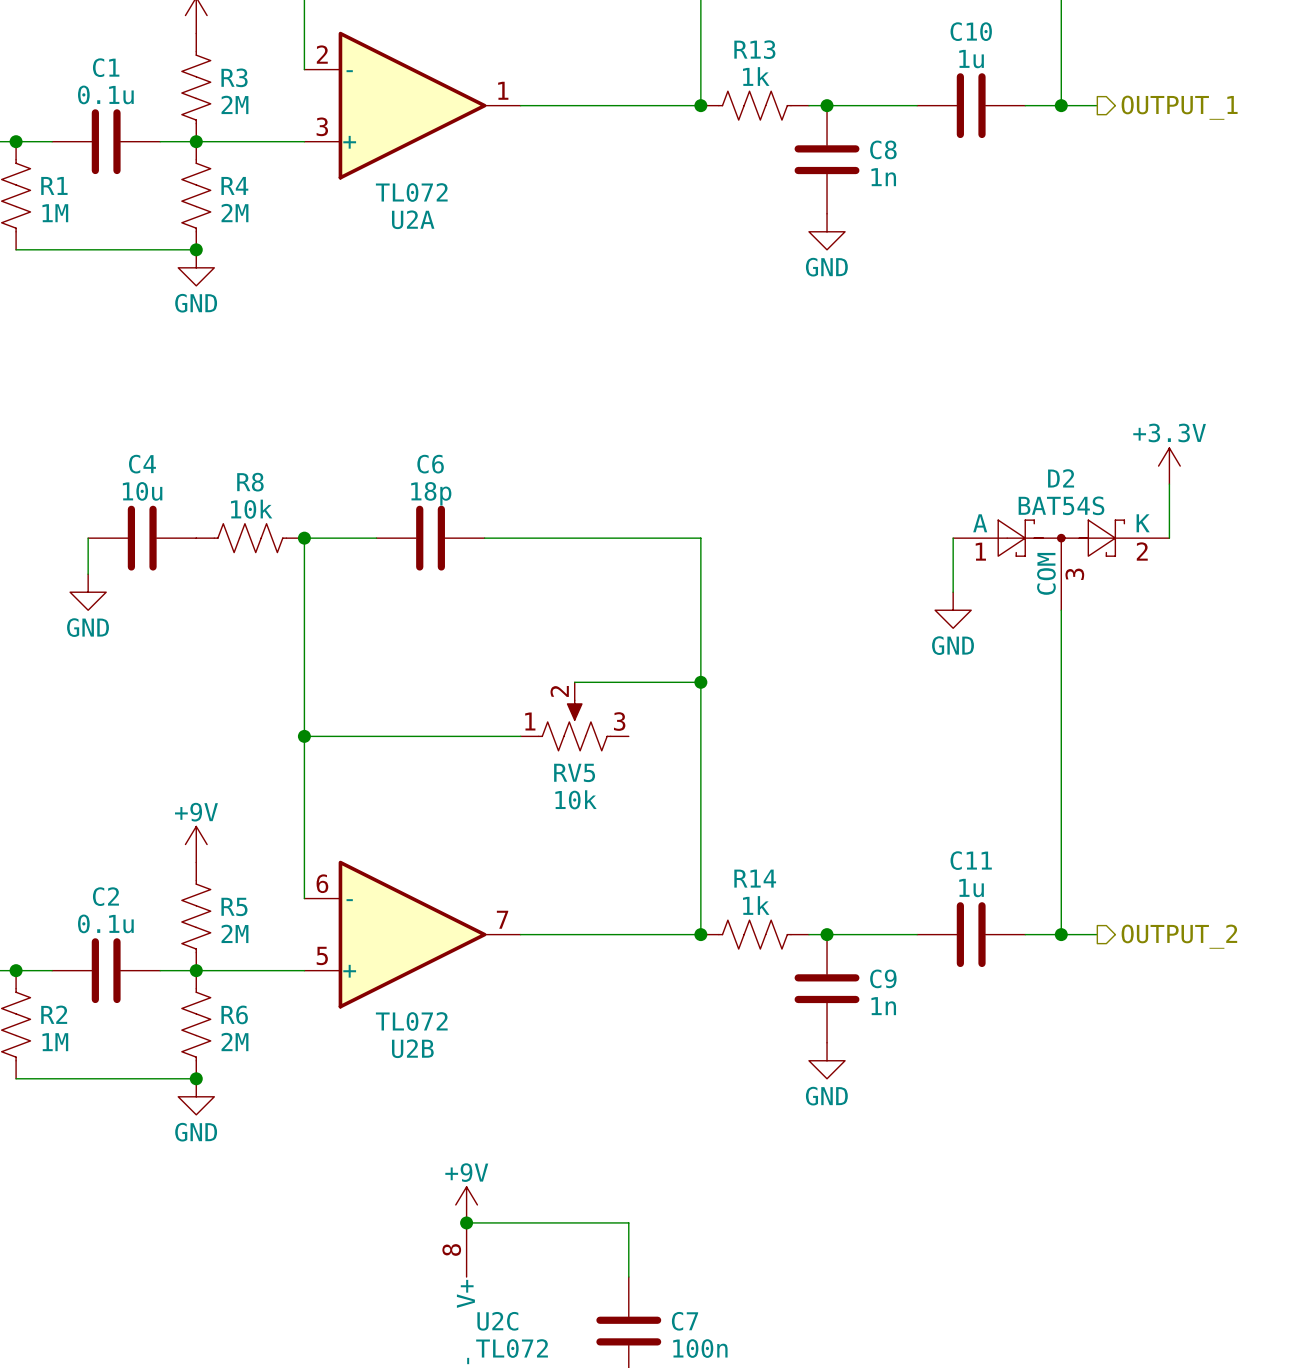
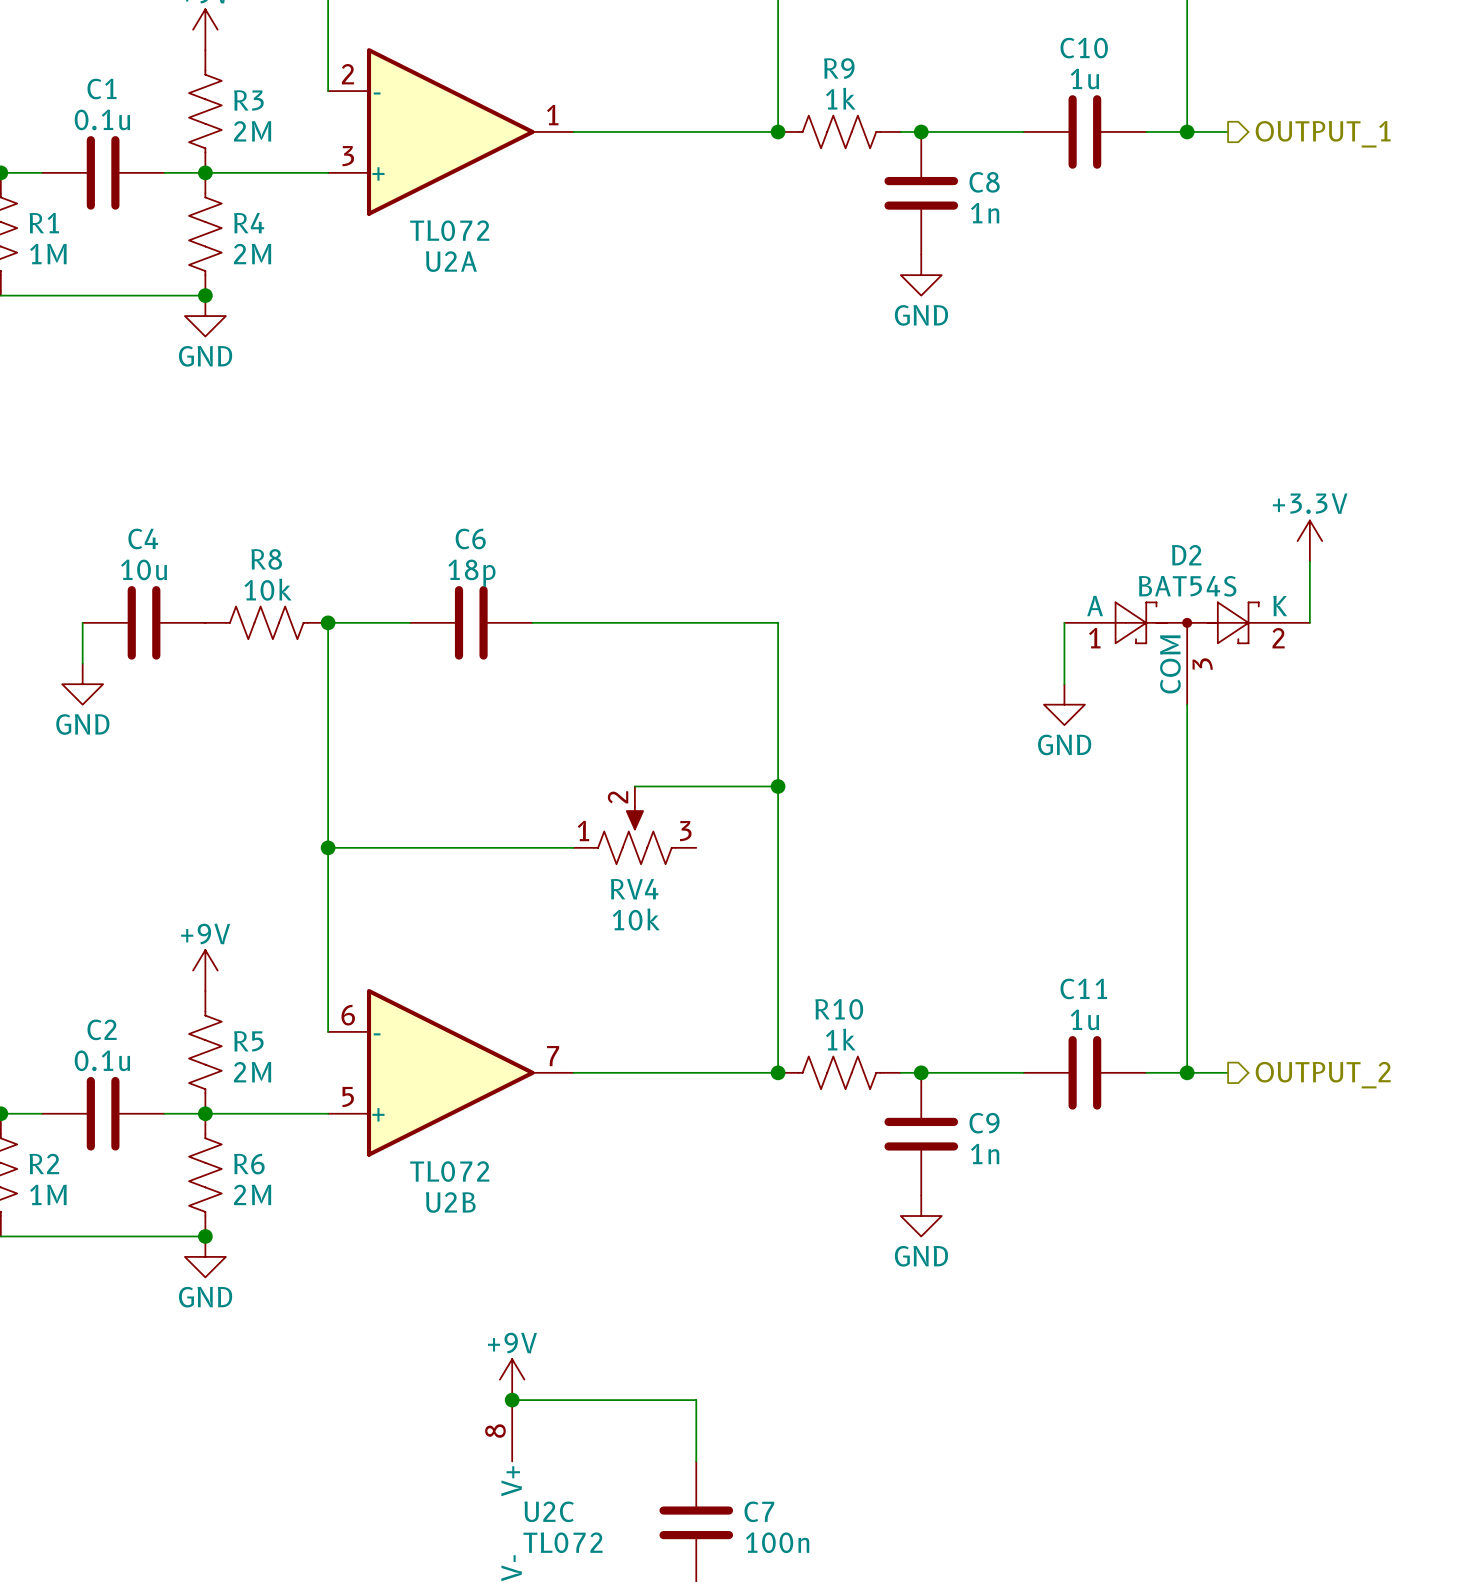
R13 name: R13 (754, 49) -> R9 (839, 68)
RV5 name: RV5 (574, 772) -> RV4 (634, 889)
R14 name: R14 (755, 878) -> R10 (839, 1009)

